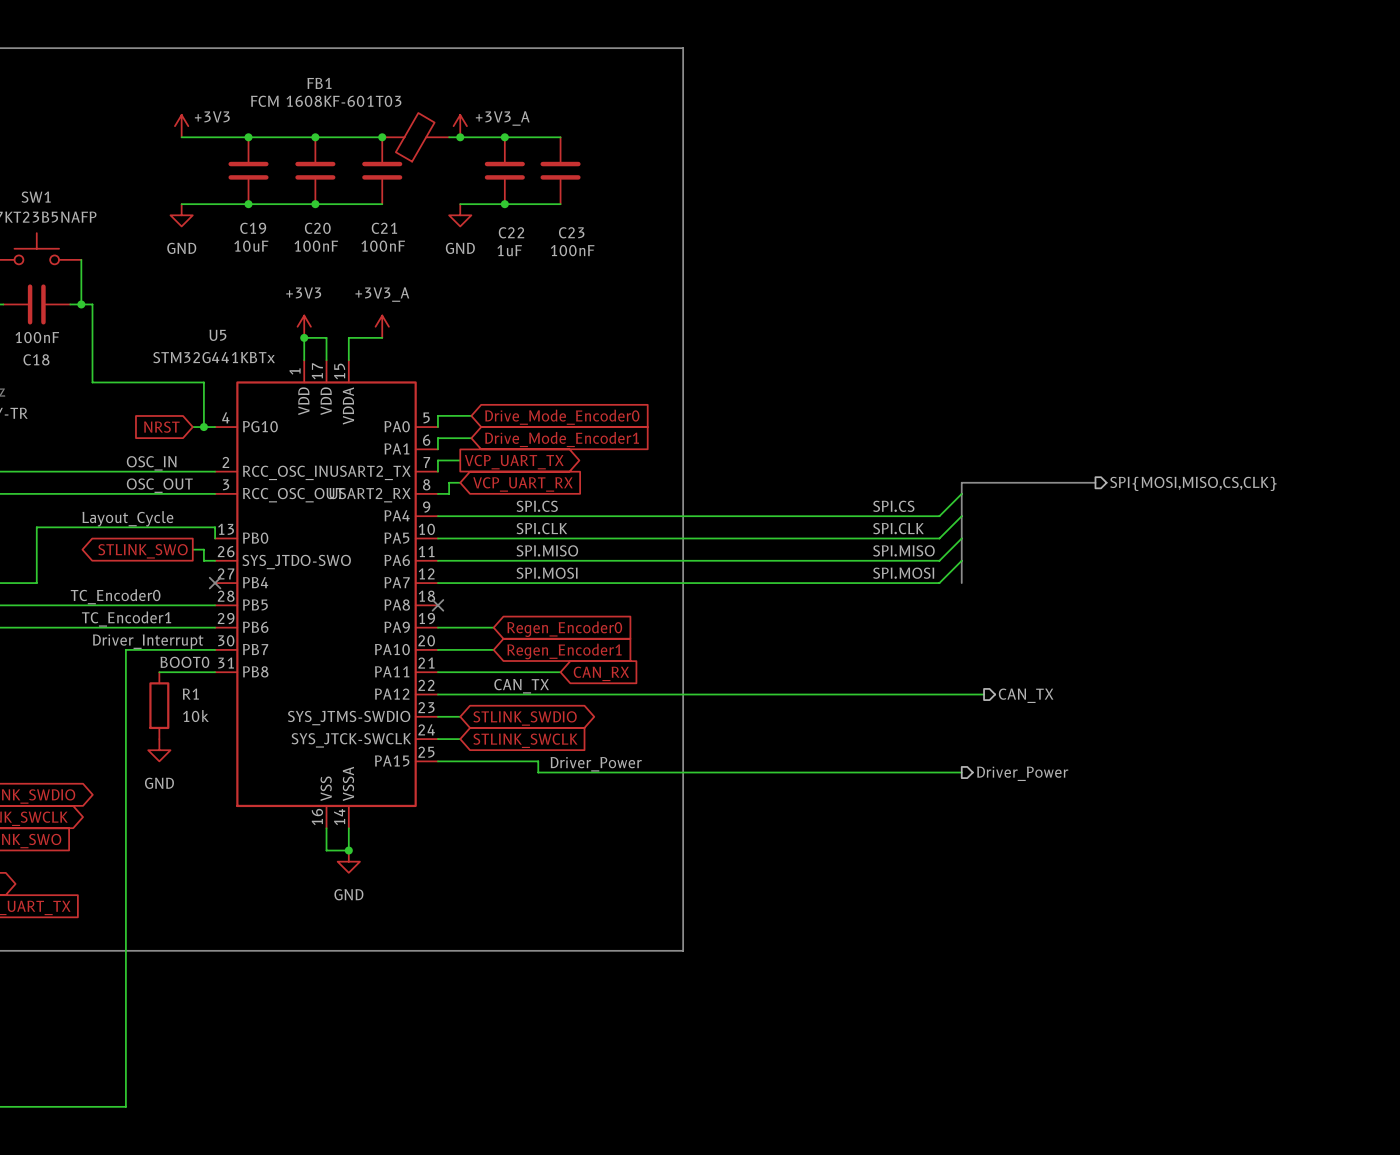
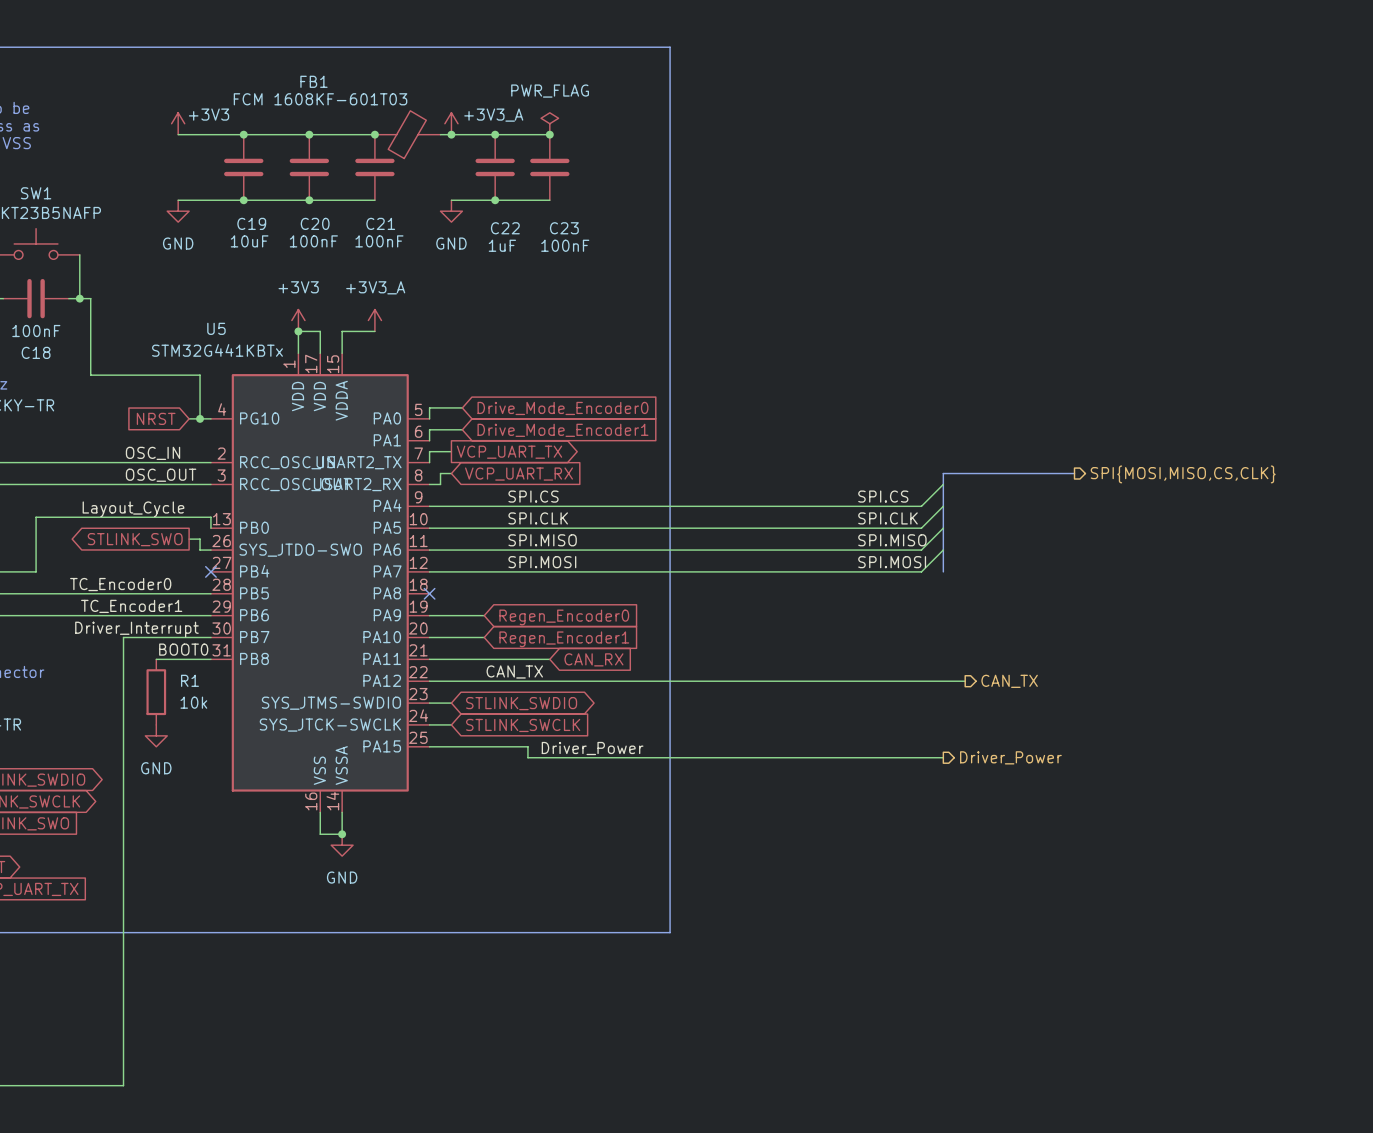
power symbol: none -> PWR_FLAG (549, 123)
junction: none -> (549, 134)

